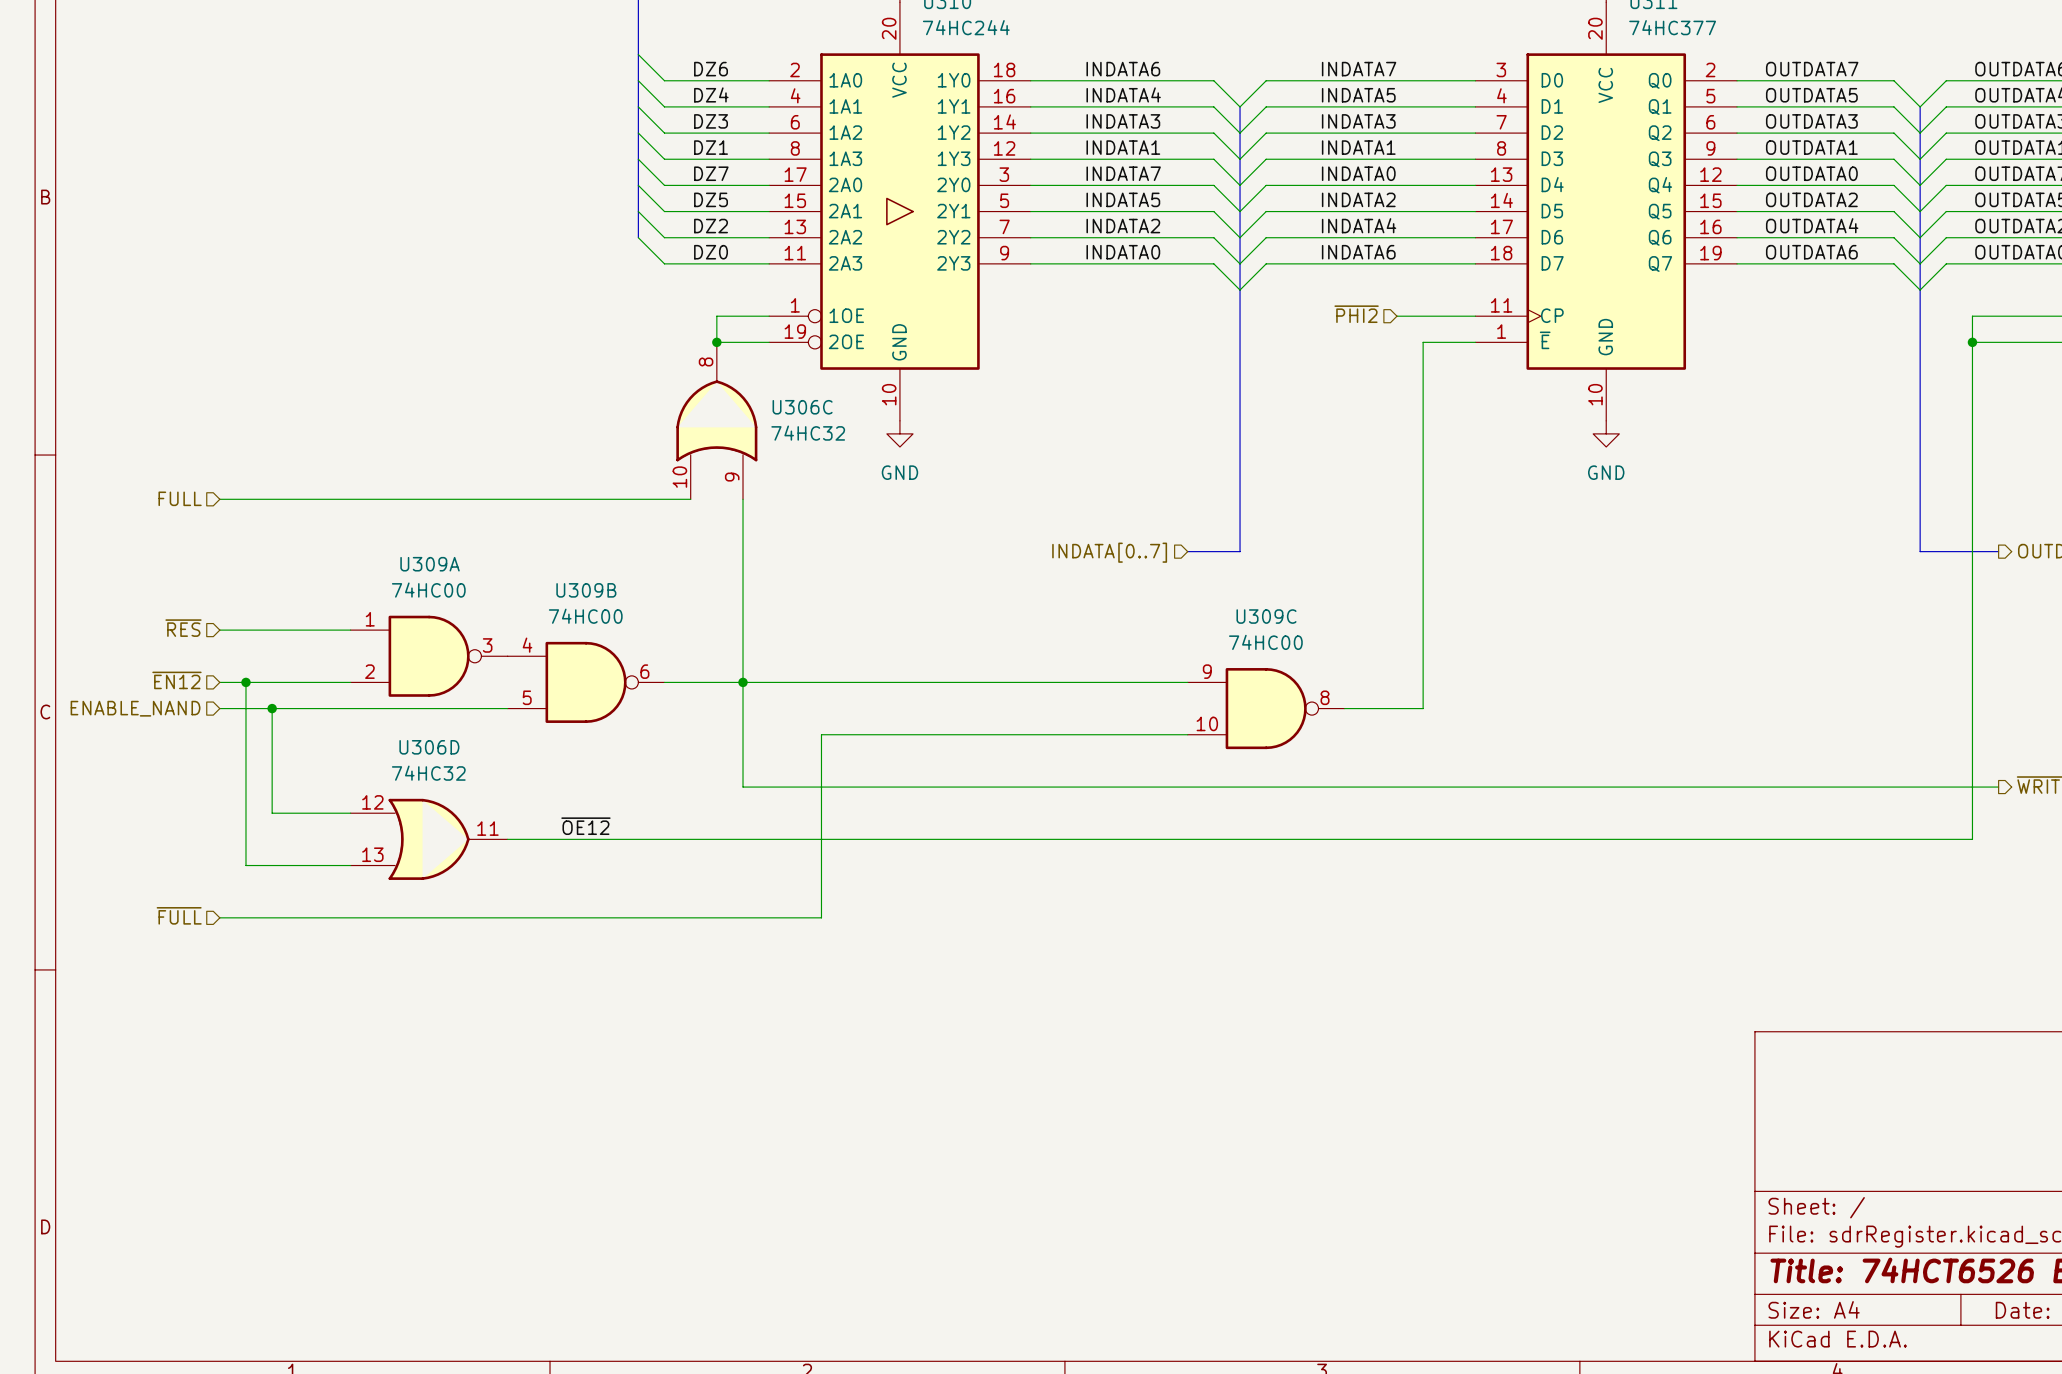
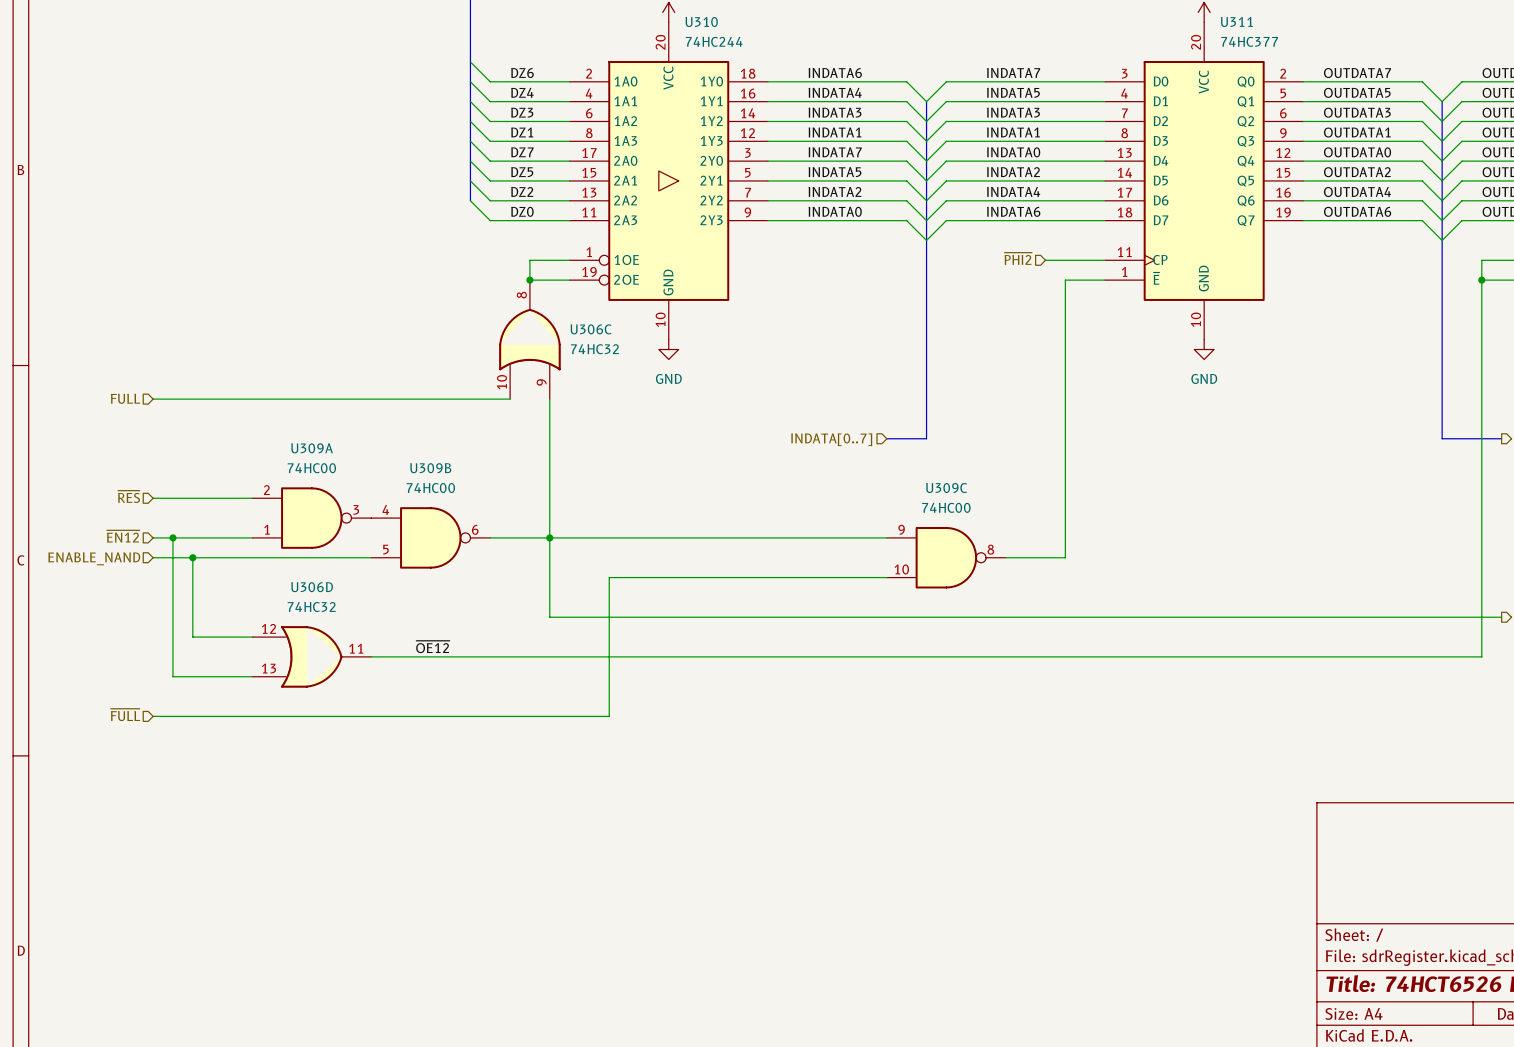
U309A flip: as is (429, 656) -> up-down (311, 518)

